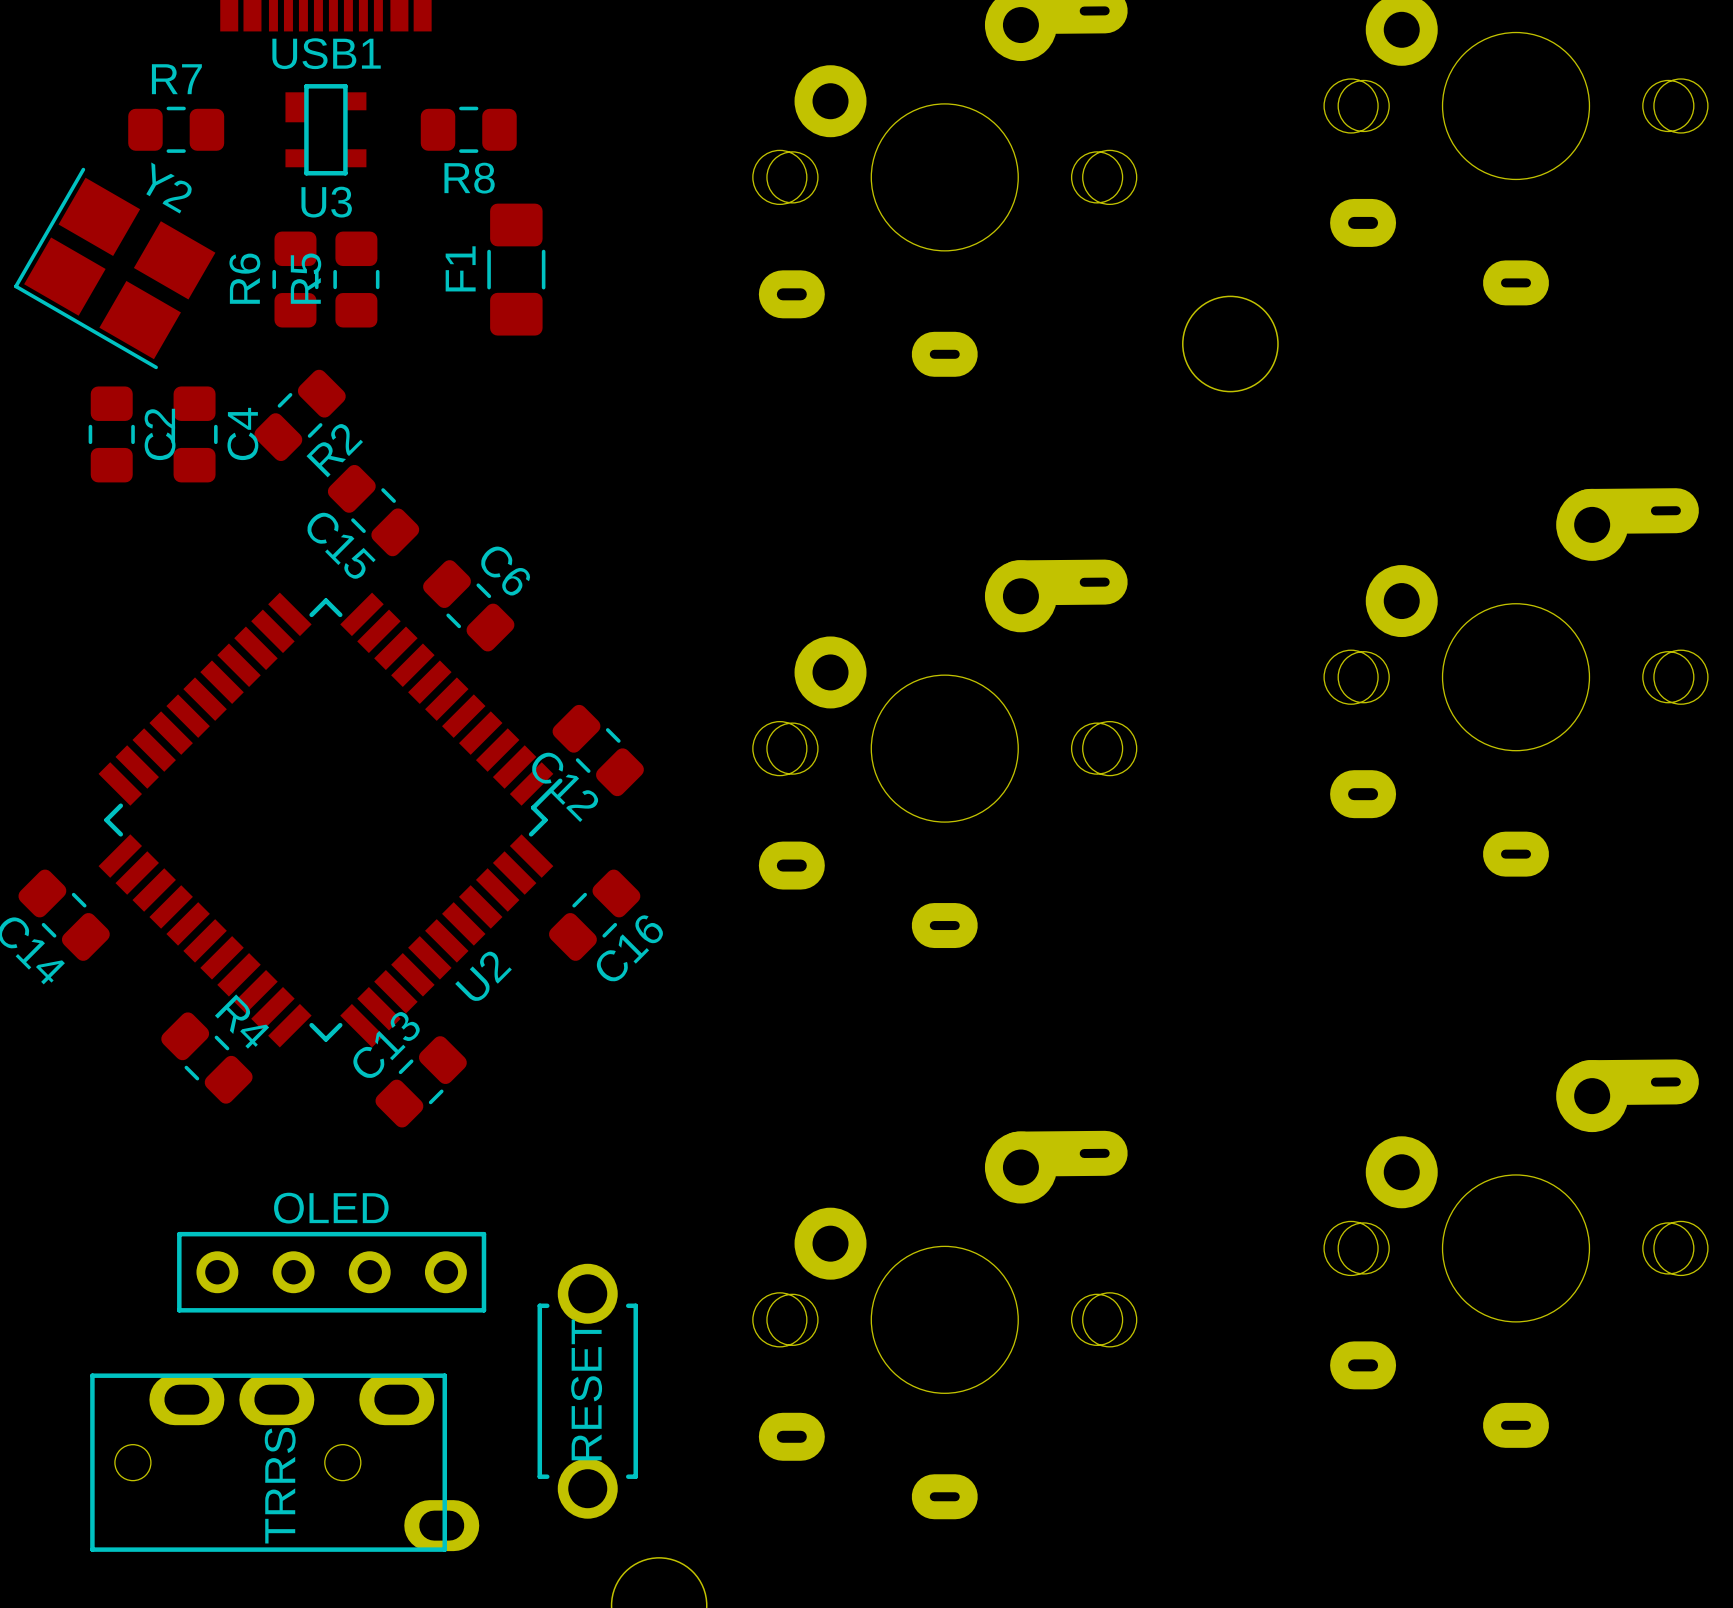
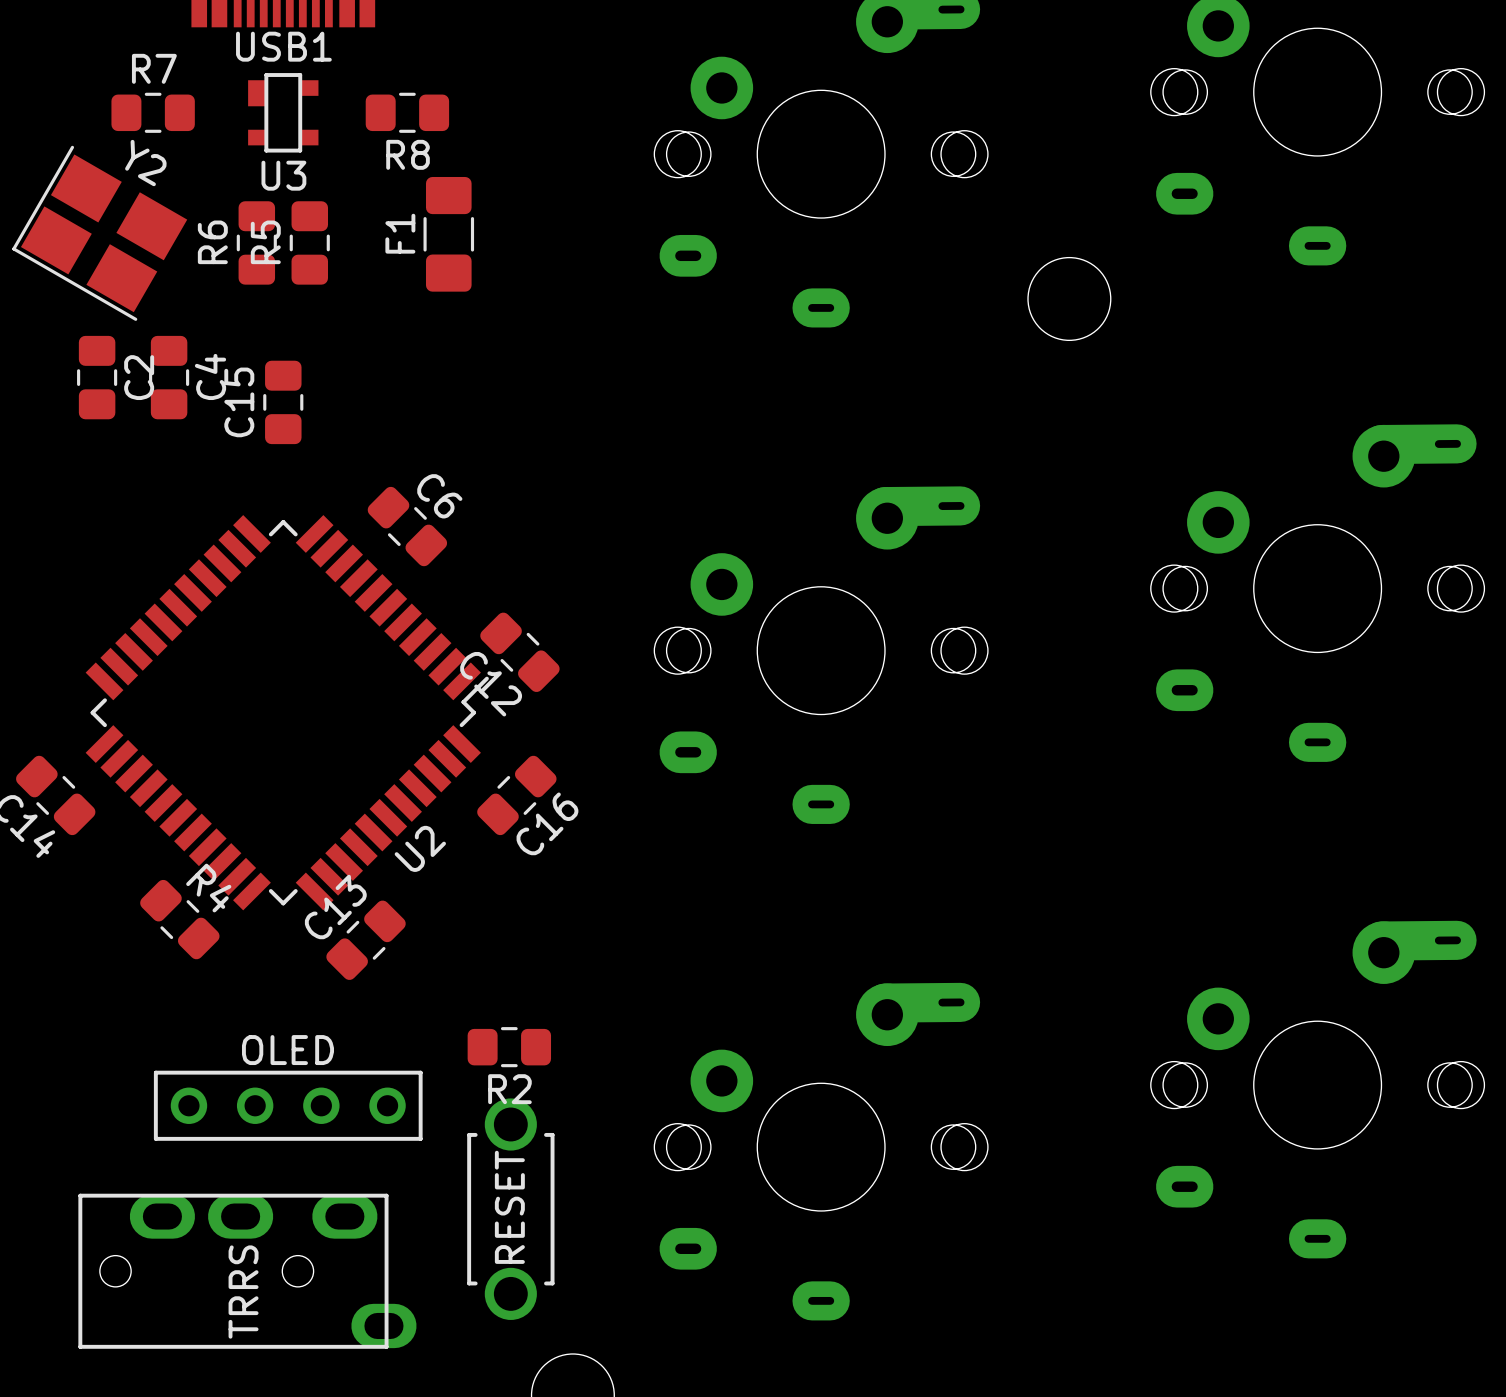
R2 rotation: 0° (300, 415) -> 45° clockwise (509, 1047)
R2 position: (300, 415) -> (509, 1047)
C15 rotation: 0° (373, 510) -> 45° clockwise (283, 402)
C15 position: (373, 510) -> (283, 402)

